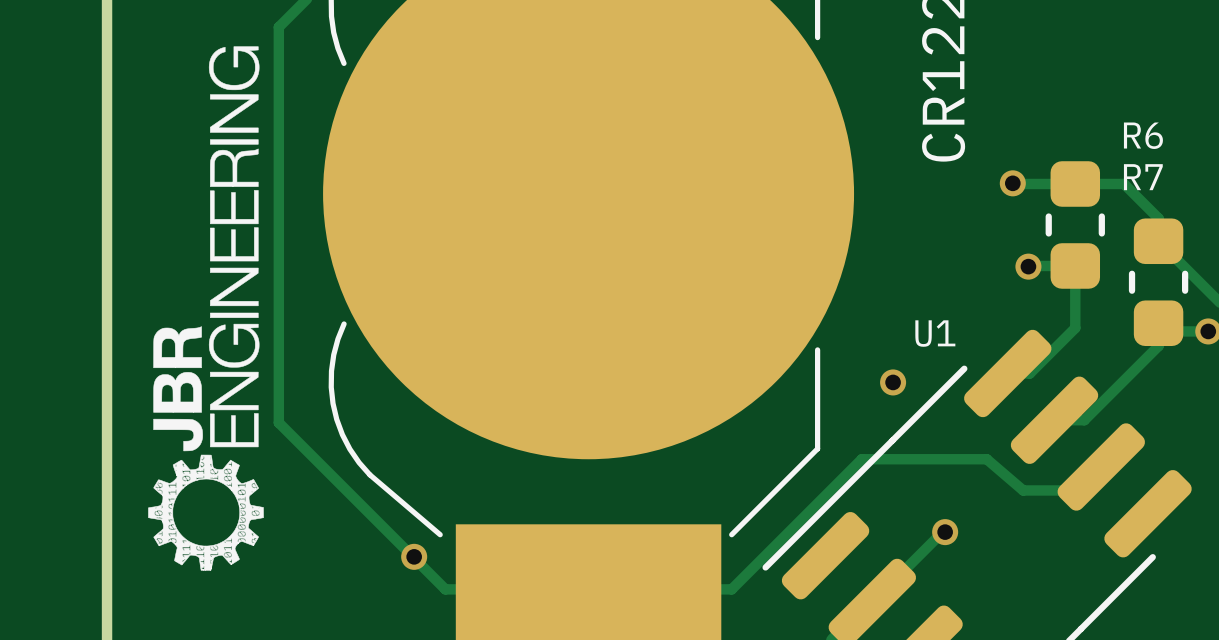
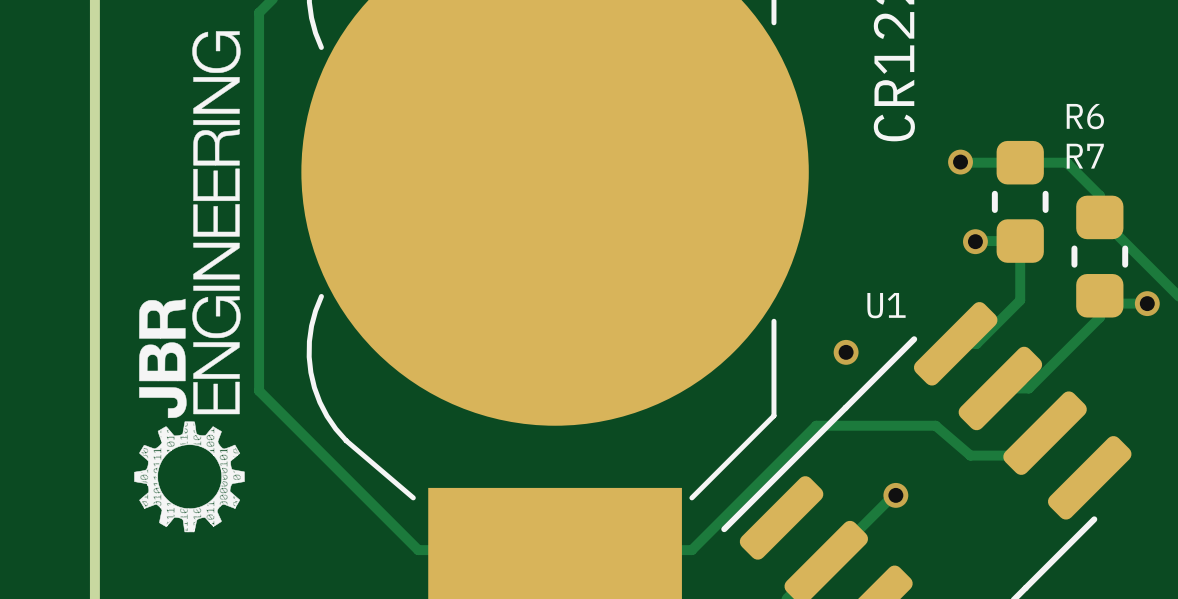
via: (414, 556) -> none

